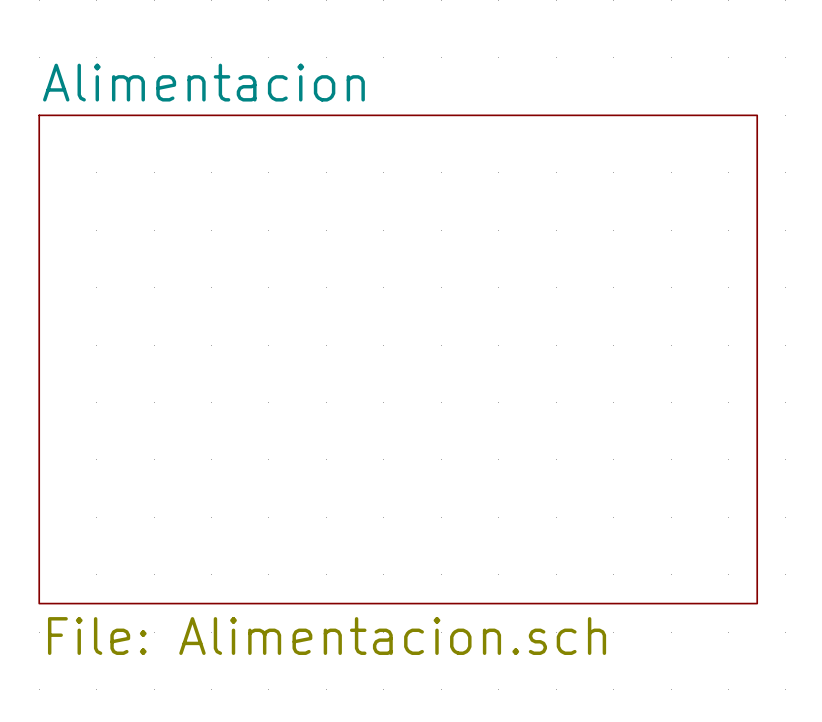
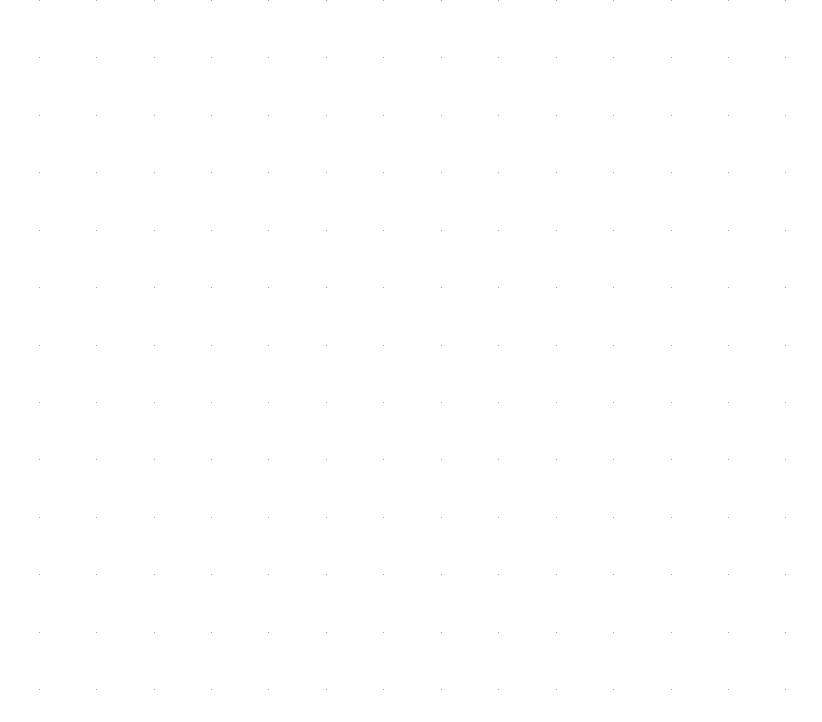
sheet Alimentacion: File: Alimentacion.sch (398, 359) -> none

